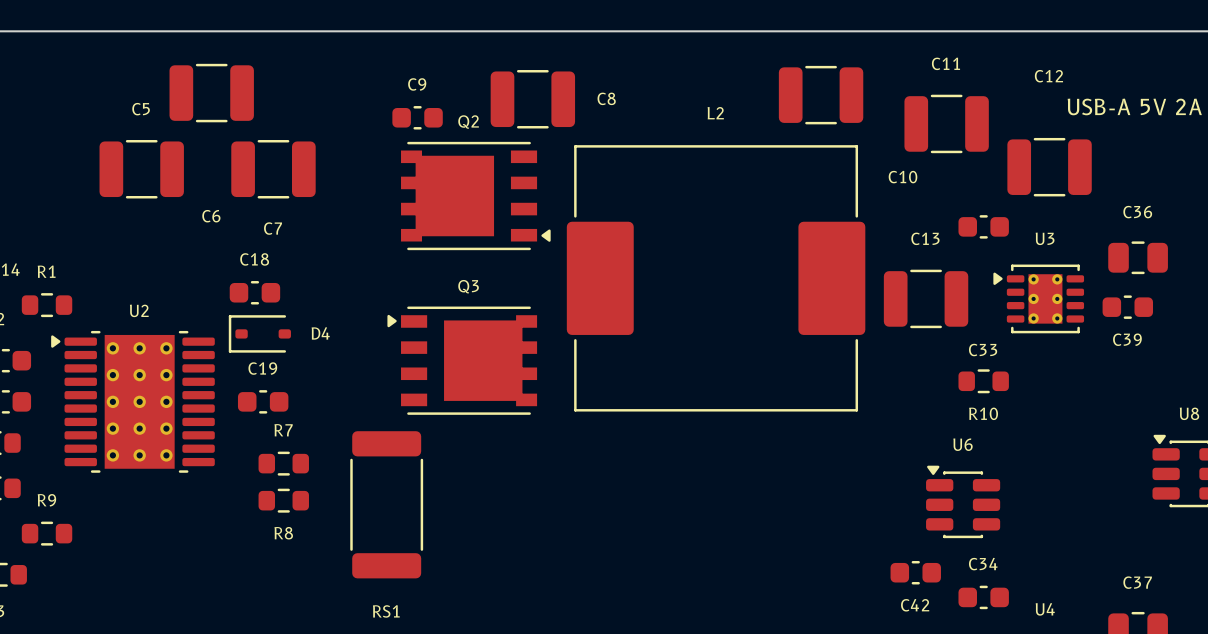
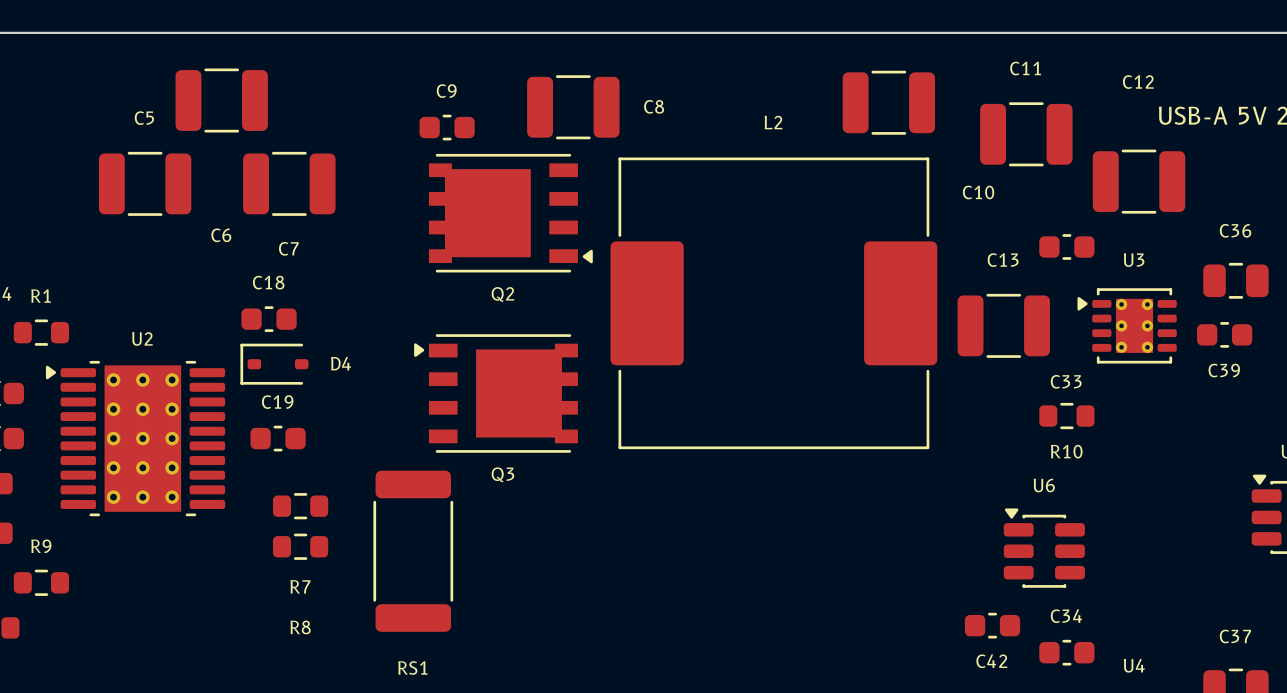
Q2 name position: Q2 (468, 122) -> Q2 (502, 294)
Q3 name position: Q3 (468, 286) -> Q3 (502, 474)
R7 name position: R7 (283, 430) -> R7 (300, 586)
R8 name position: R8 (283, 533) -> R8 (300, 627)

